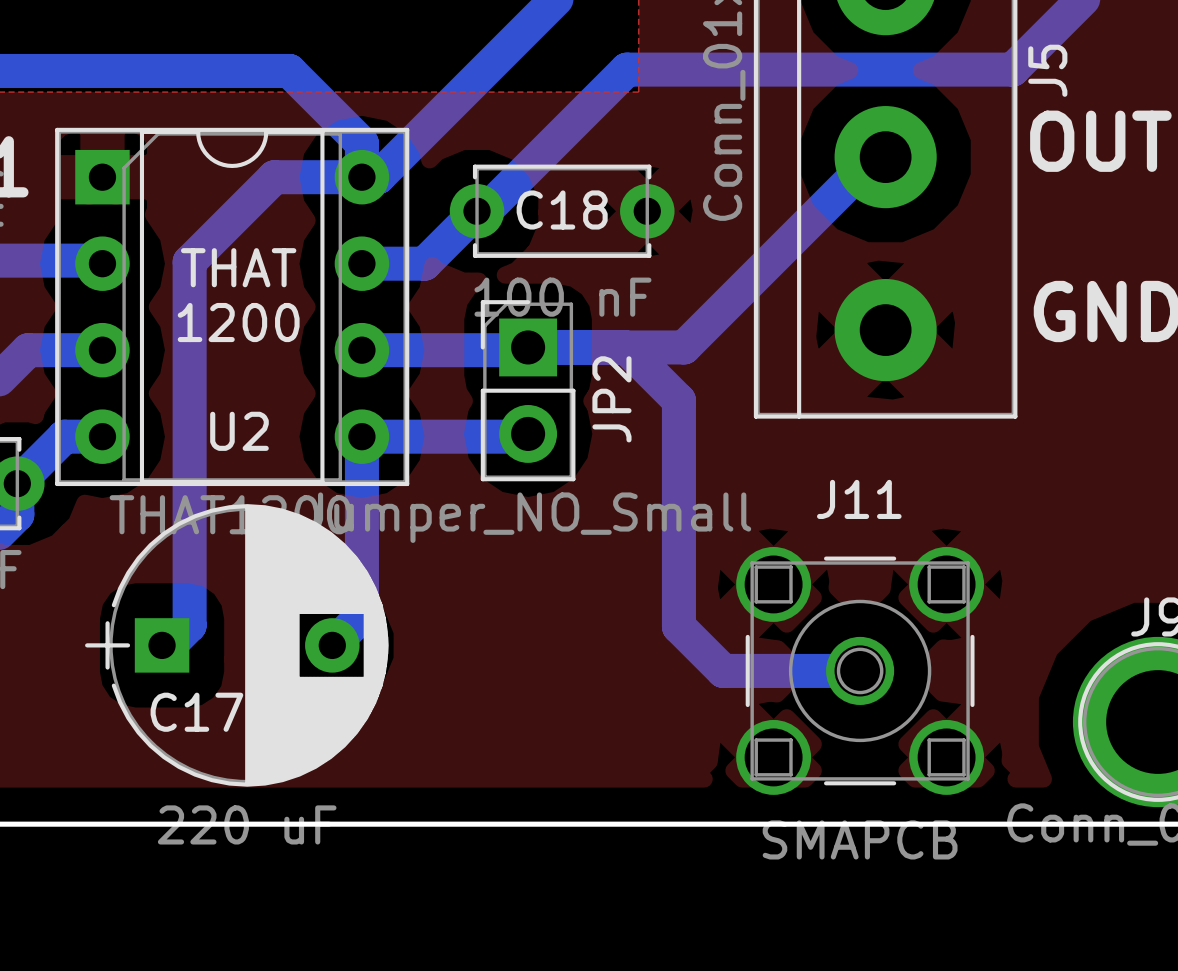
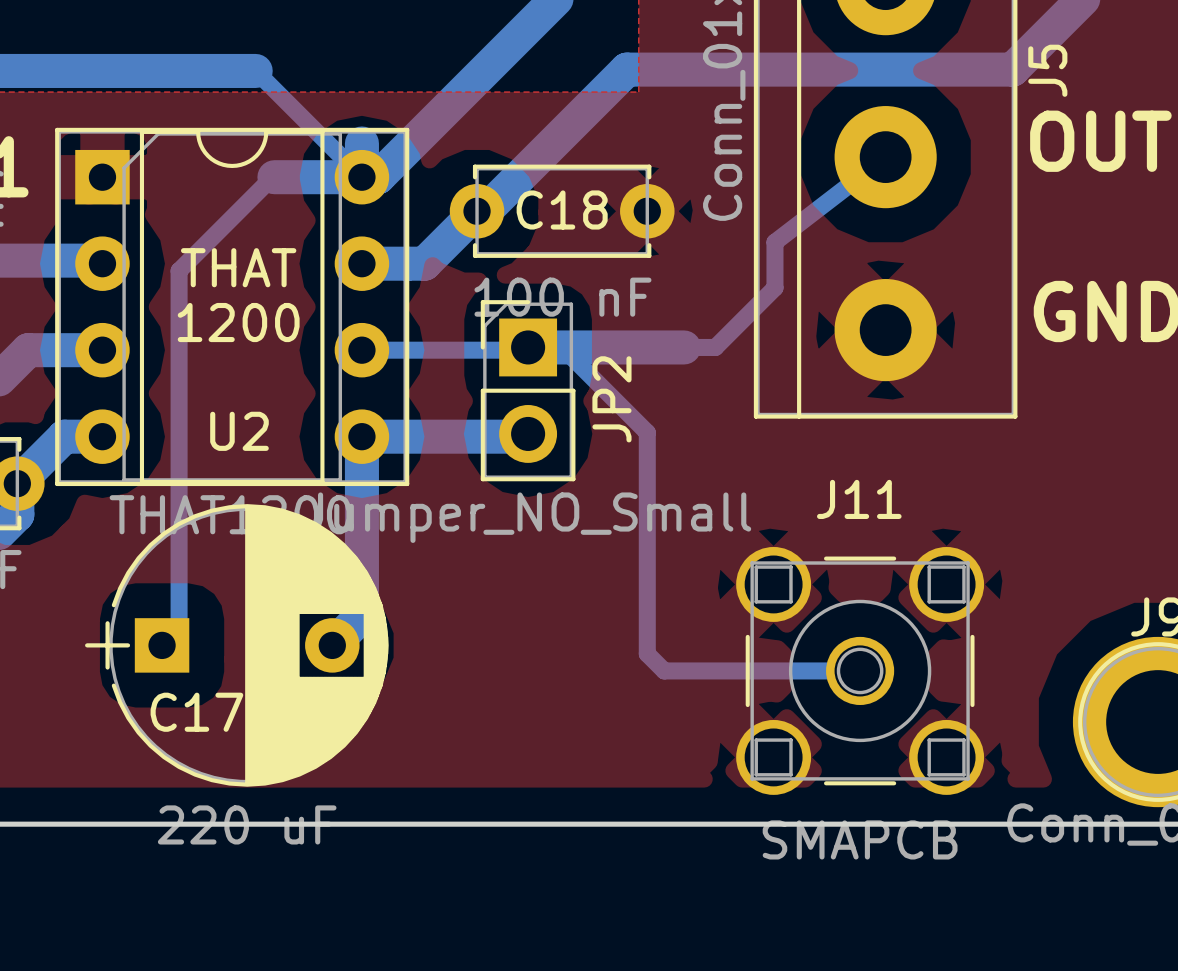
bottom track: (255, 70) (289, 70) (361, 143) -> (255, 70) (357, 173)
bottom track: (885, 157) (874, 157) (684, 347) -> (885, 157) (774, 242) (774, 287) (715, 347) (684, 347)
bottom track: (274, 177) (189, 261) (189, 625) (169, 645) (162, 645) -> (274, 177) (179, 270) (179, 628)
bottom track: (625, 347) (678, 400) (678, 626) (723, 670) -> (562, 347) (647, 432) (647, 653) (664, 670) (723, 670)
bottom track width: thick (361, 350) (525, 350) -> thin (361, 350) (525, 350)
bottom track width: thick (723, 670) (860, 670) -> thin (723, 670) (860, 670)

